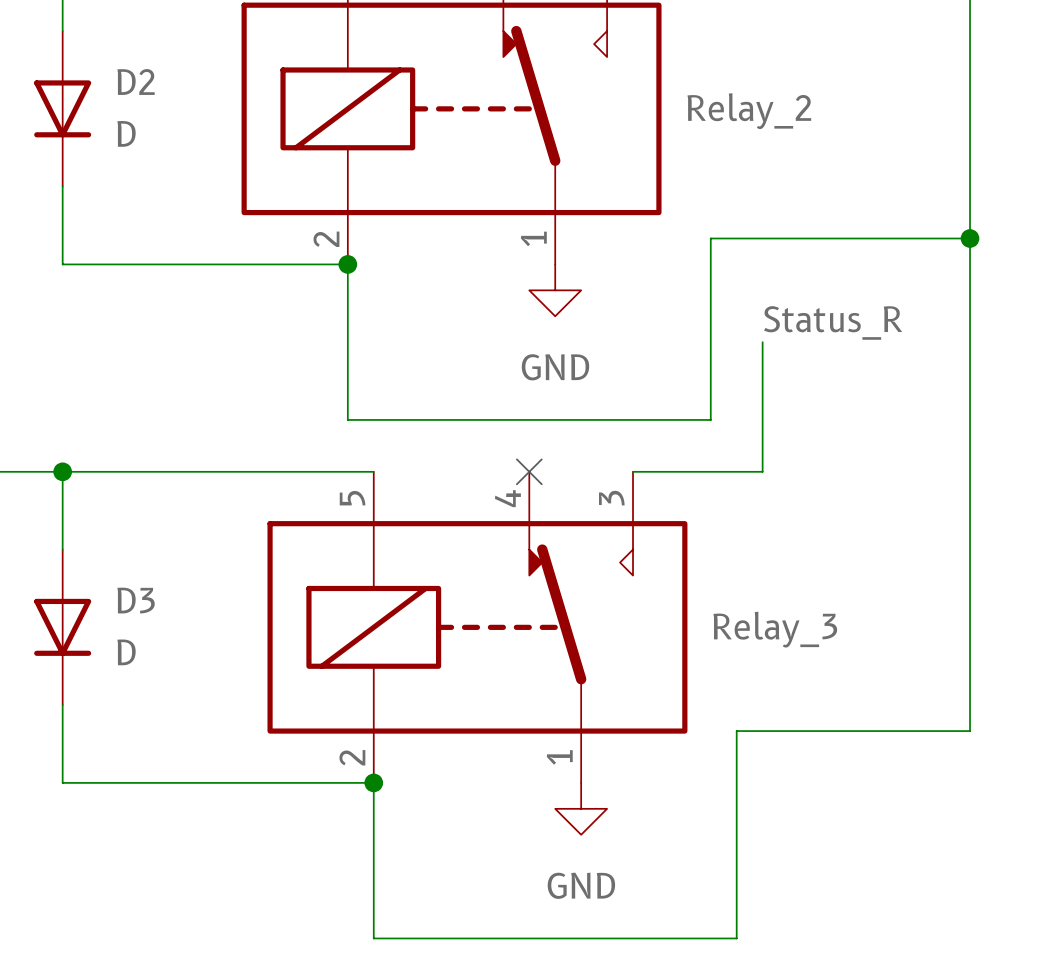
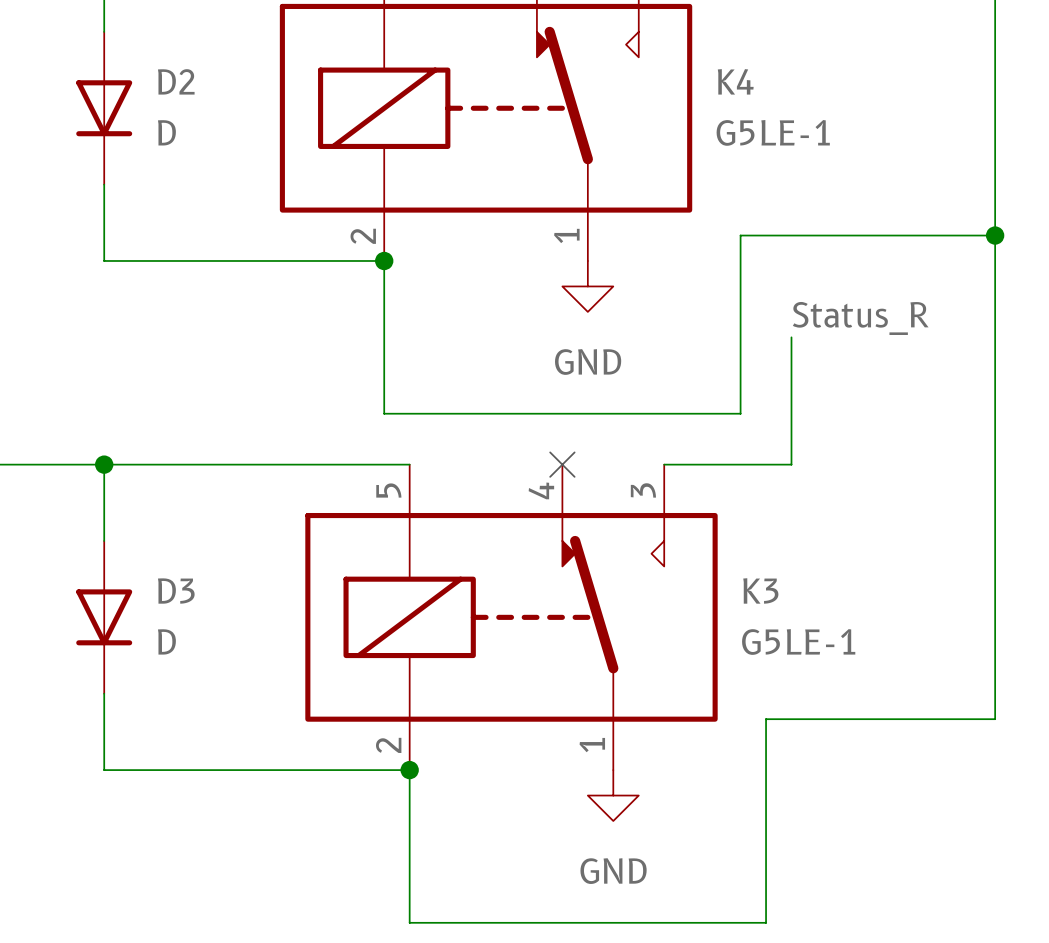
Relay_2 name: Relay_2 (749, 111) -> K4 (735, 81)
Relay_2 value: none -> G5LE-1 (773, 132)
Relay_3 name: Relay_3 (775, 629) -> K3 (760, 590)
Relay_3 value: none -> G5LE-1 (798, 642)

